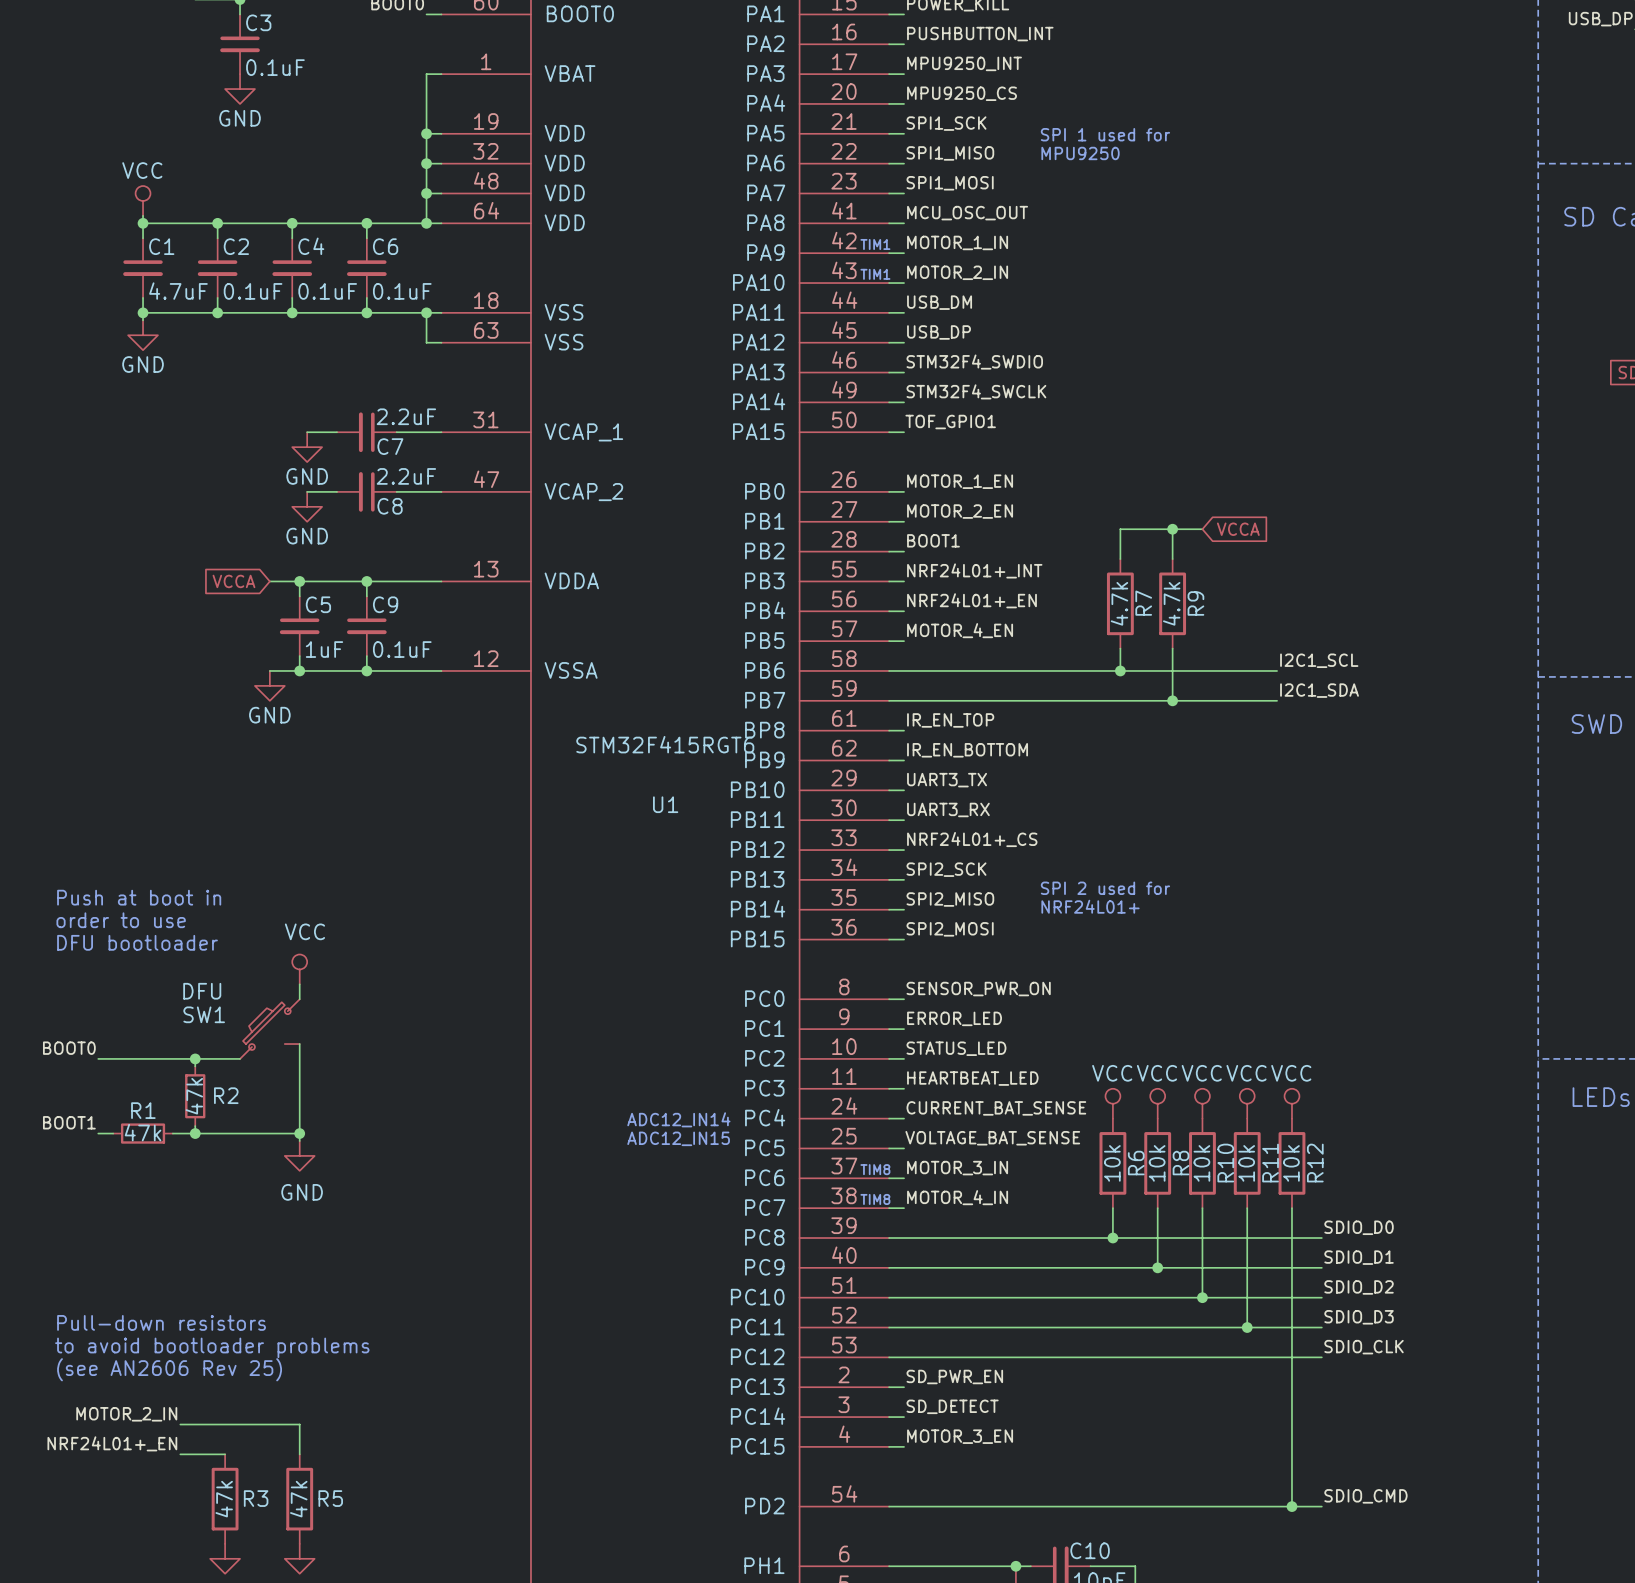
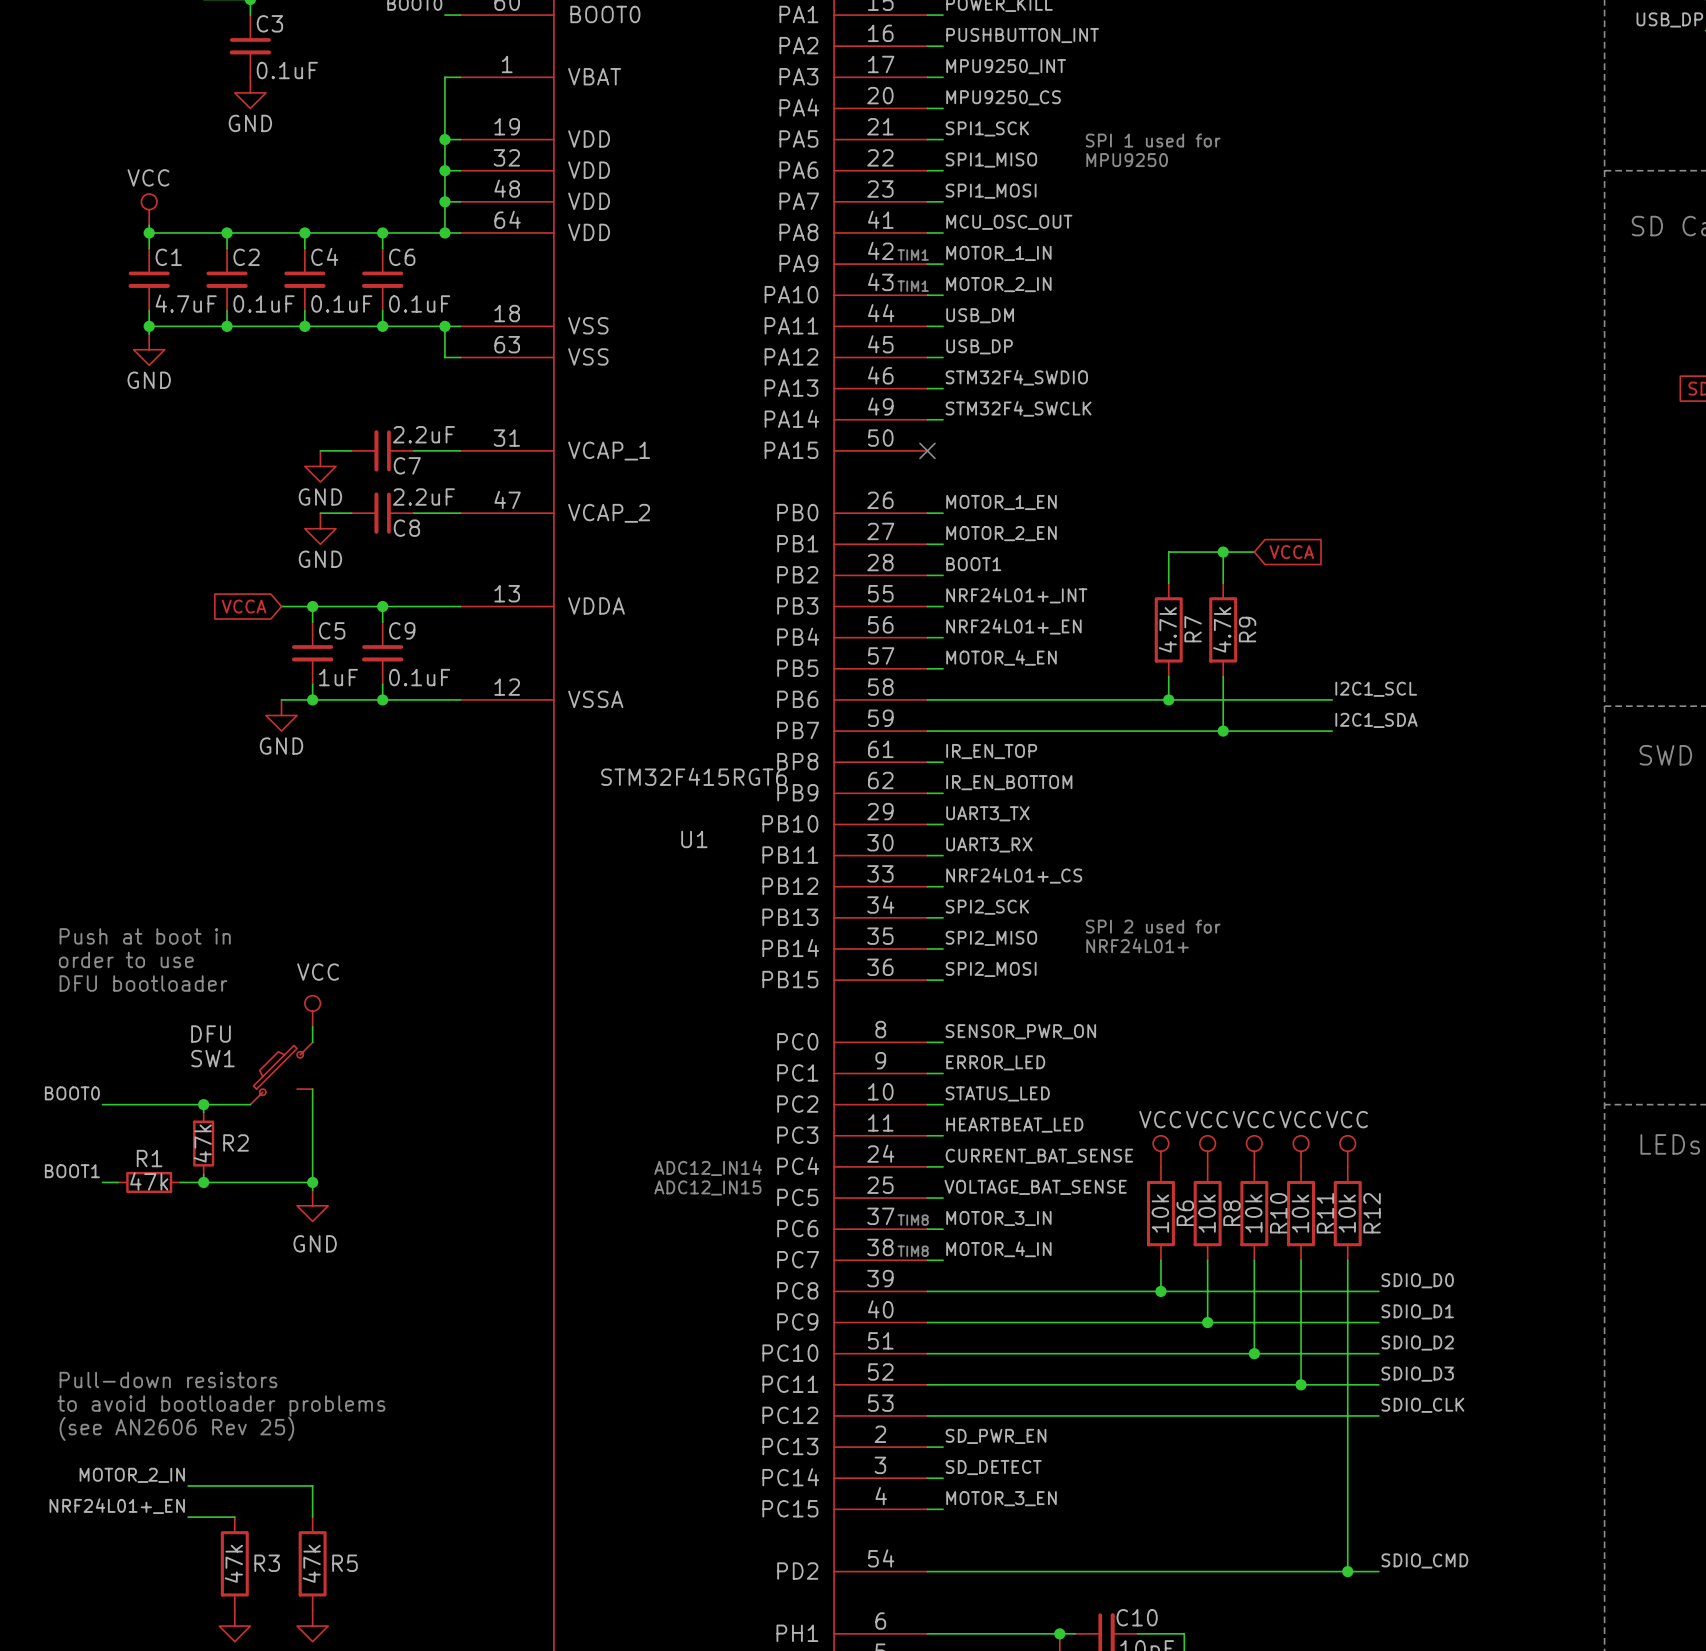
label: TOF_GPIO1 (950, 422) -> none
wire: (889, 432) (904, 432) -> none
no-connect mark: none -> (927, 450)

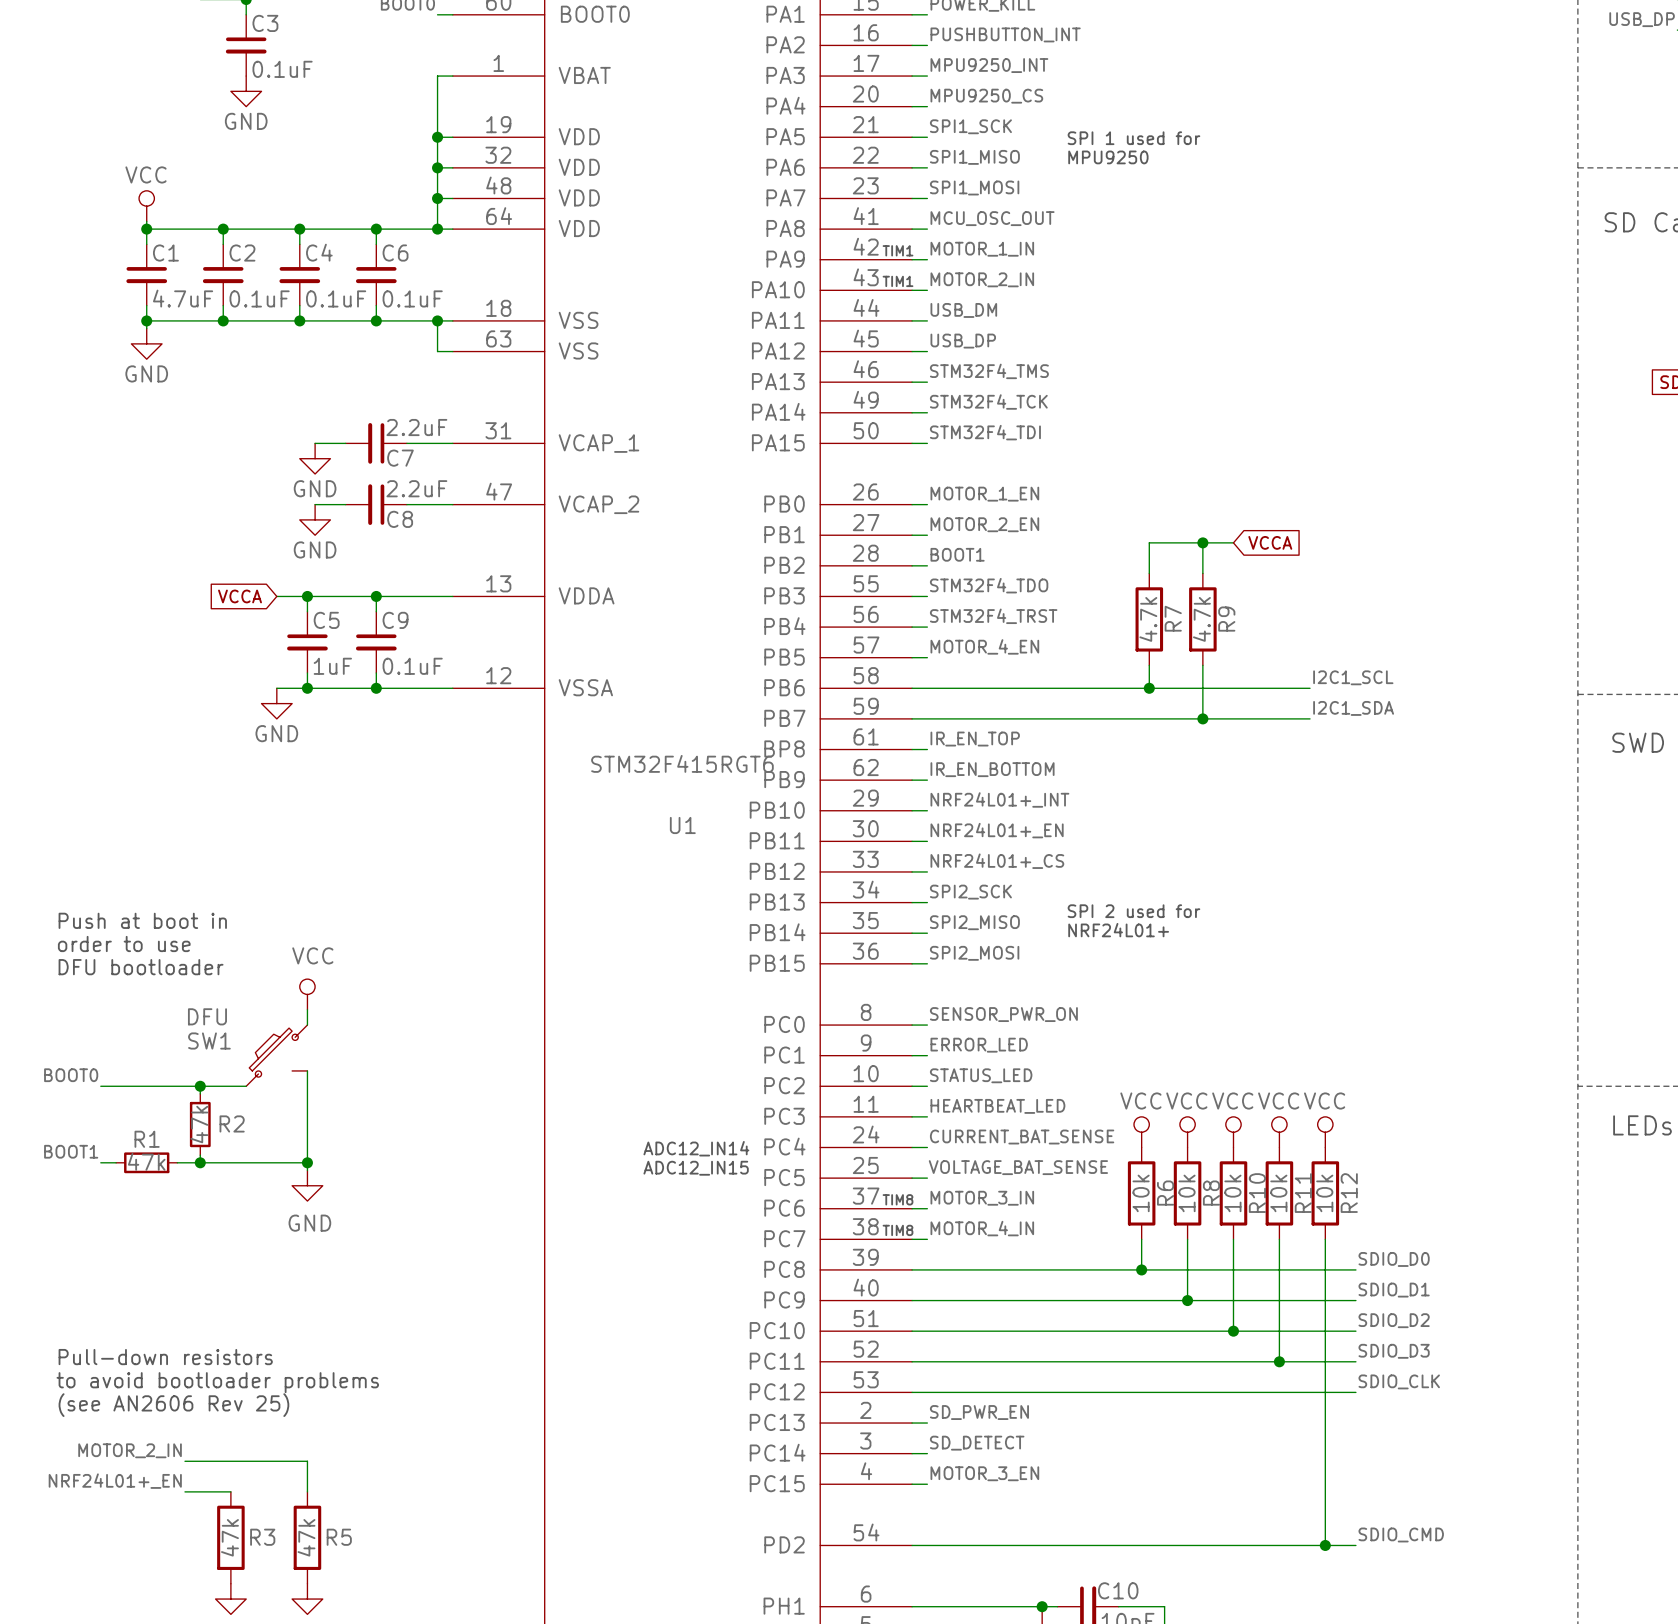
label: STM32F4_SWDIO (1016, 377) -> STM32F4_TMS (989, 371)
label: STM32F4_SWCLK (1018, 408) -> STM32F4_TCK (988, 402)
label: none -> STM32F4_TDI (985, 432)
wire: none -> (912, 443) (927, 443)
no-connect mark: (927, 450) -> none
label: NRF24L01+_INT (1016, 595) -> STM32F4_TDO (989, 585)
label: NRF24L01+_EN (1013, 626) -> STM32F4_TRST (993, 616)
label: UART3_TX (987, 813) -> NRF24L01+_INT (999, 799)
label: UART3_RX (989, 844) -> NRF24L01+_EN (997, 830)

